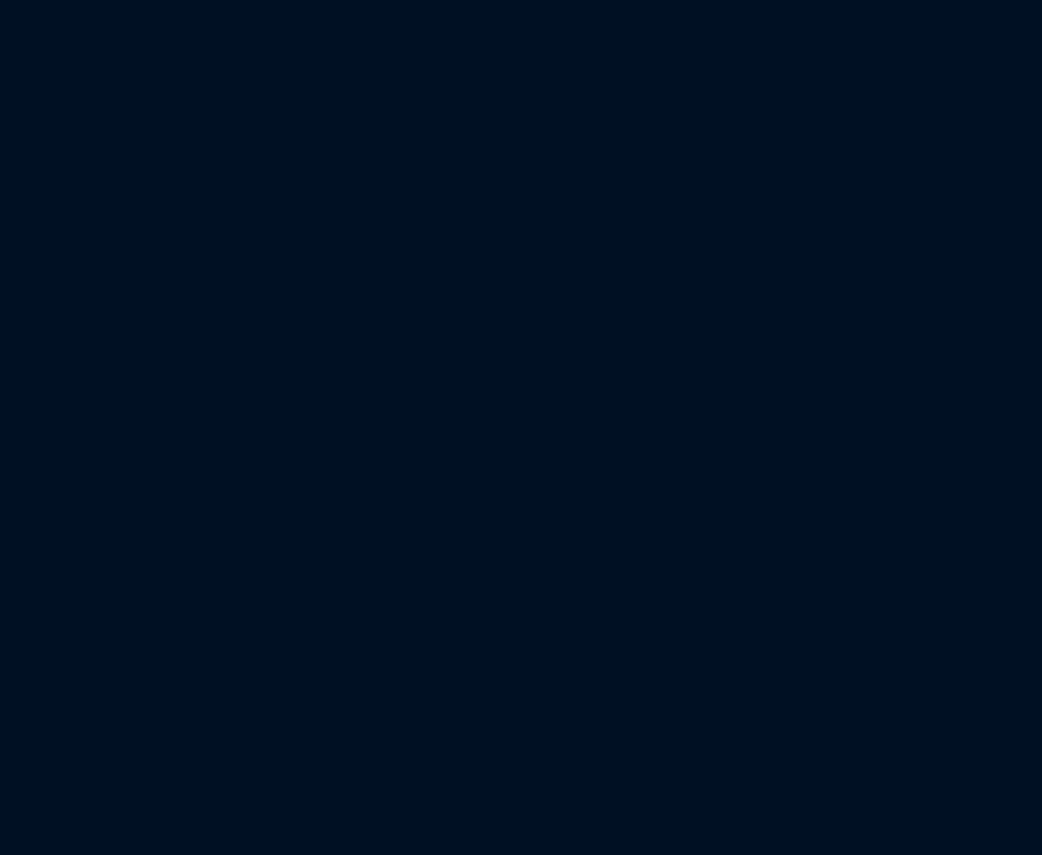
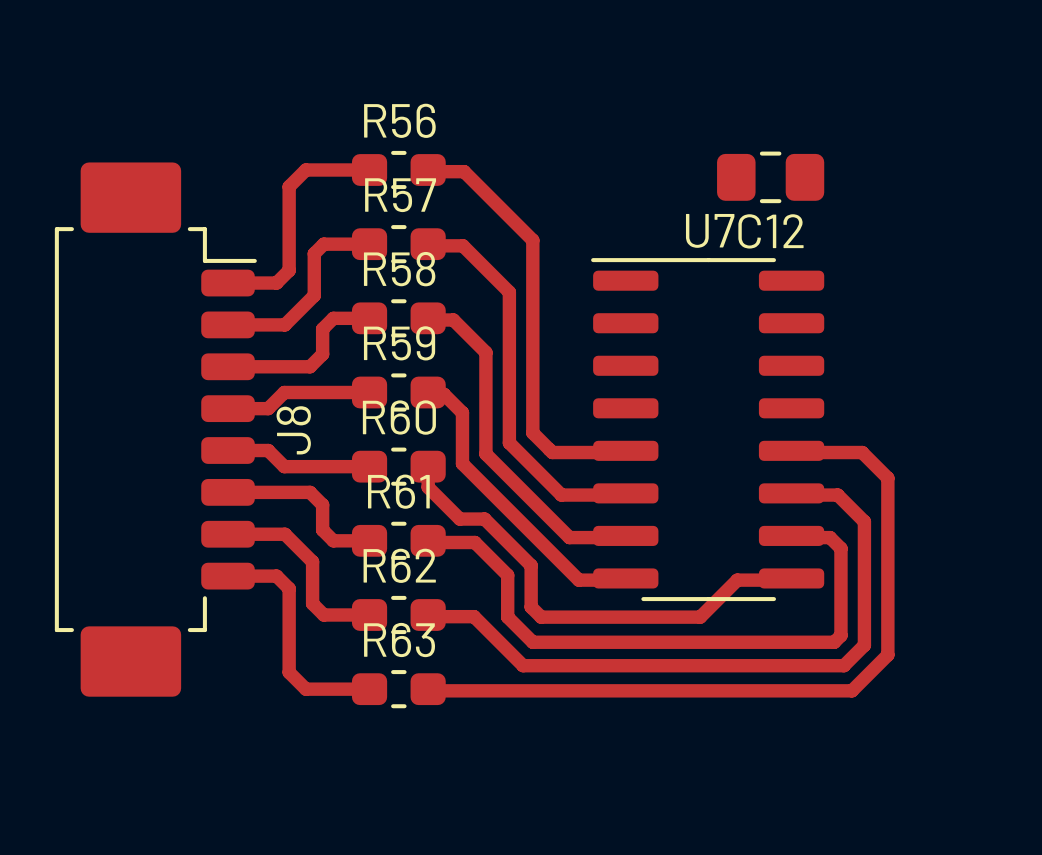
top track: none -> (368, 170) (305, 170) (289, 186) (289, 270) (276, 283) (227, 283)
R56: none -> (398, 170)
top track: none -> (428, 171) (464, 171) (532, 240) (532, 432) (552, 452) (625, 452)
C12: none -> (770, 177)
top track: none -> (368, 244) (323, 244) (314, 253) (314, 295) (284, 324) (227, 324)
R57: none -> (398, 244)
top track: none -> (428, 245) (462, 245) (509, 292) (509, 442) (561, 495) (625, 495)
top track: none -> (368, 318) (333, 318) (322, 329) (322, 354) (310, 366) (227, 366)
R58: none -> (398, 318)
top track: none -> (428, 320) (453, 320) (485, 352) (485, 454) (569, 537) (625, 537)
top track: none -> (368, 392) (284, 392) (268, 408) (227, 408)
R59: none -> (398, 392)
top track: none -> (428, 394) (443, 394) (462, 412) (462, 463) (578, 580) (625, 580)
J8: none -> (155, 429)
U7: none -> (707, 429)
top track: none -> (227, 450) (268, 450) (284, 466) (368, 466)
top track: none -> (791, 452) (862, 452) (887, 478) (887, 654) (852, 690) (428, 690)
R60: none -> (398, 466)
top track: none -> (428, 468) (428, 487) (459, 519) (484, 519) (531, 565) (531, 607) (541, 617) (700, 617) (737, 580) (791, 580)
top track: none -> (227, 492) (310, 492) (322, 504) (322, 530) (333, 540) (368, 540)
top track: none -> (791, 495) (837, 495) (864, 521) (864, 645) (843, 665) (523, 665) (474, 616) (428, 616)
top track: none -> (227, 534) (284, 534) (312, 561) (312, 603) (323, 614) (368, 614)
top track: none -> (791, 537) (830, 537) (840, 548) (840, 635) (834, 642) (532, 642) (507, 617) (507, 575) (474, 542) (428, 542)
R61: none -> (398, 540)
top track: none -> (227, 576) (276, 576) (289, 588) (289, 672) (305, 689) (368, 689)
R62: none -> (398, 614)
R63: none -> (398, 689)

